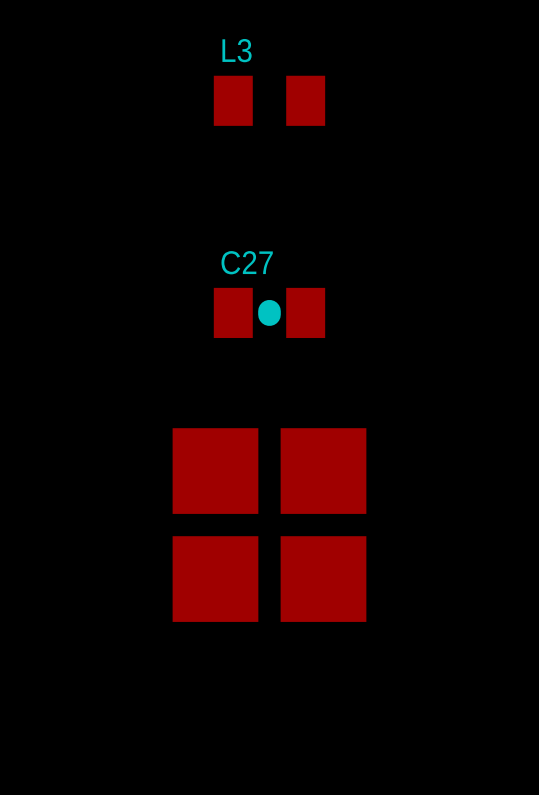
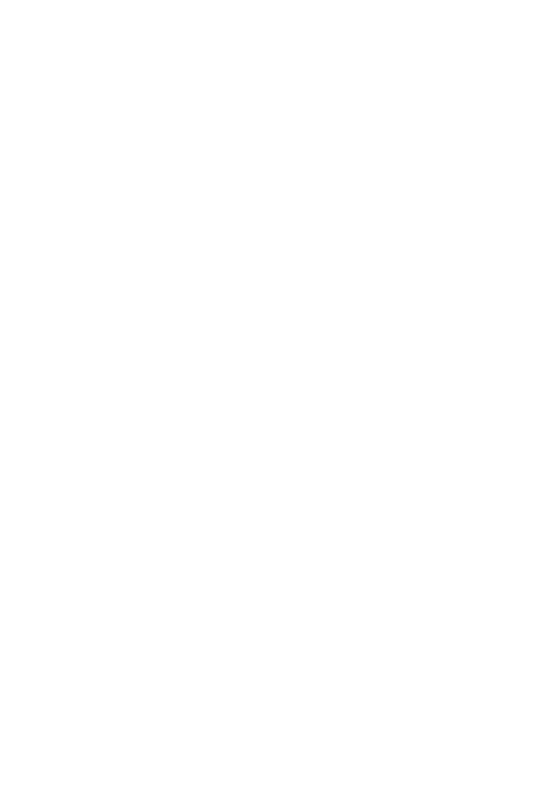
L3: (269, 100) -> none
C27: (269, 312) -> none
part: (269, 525) -> none

